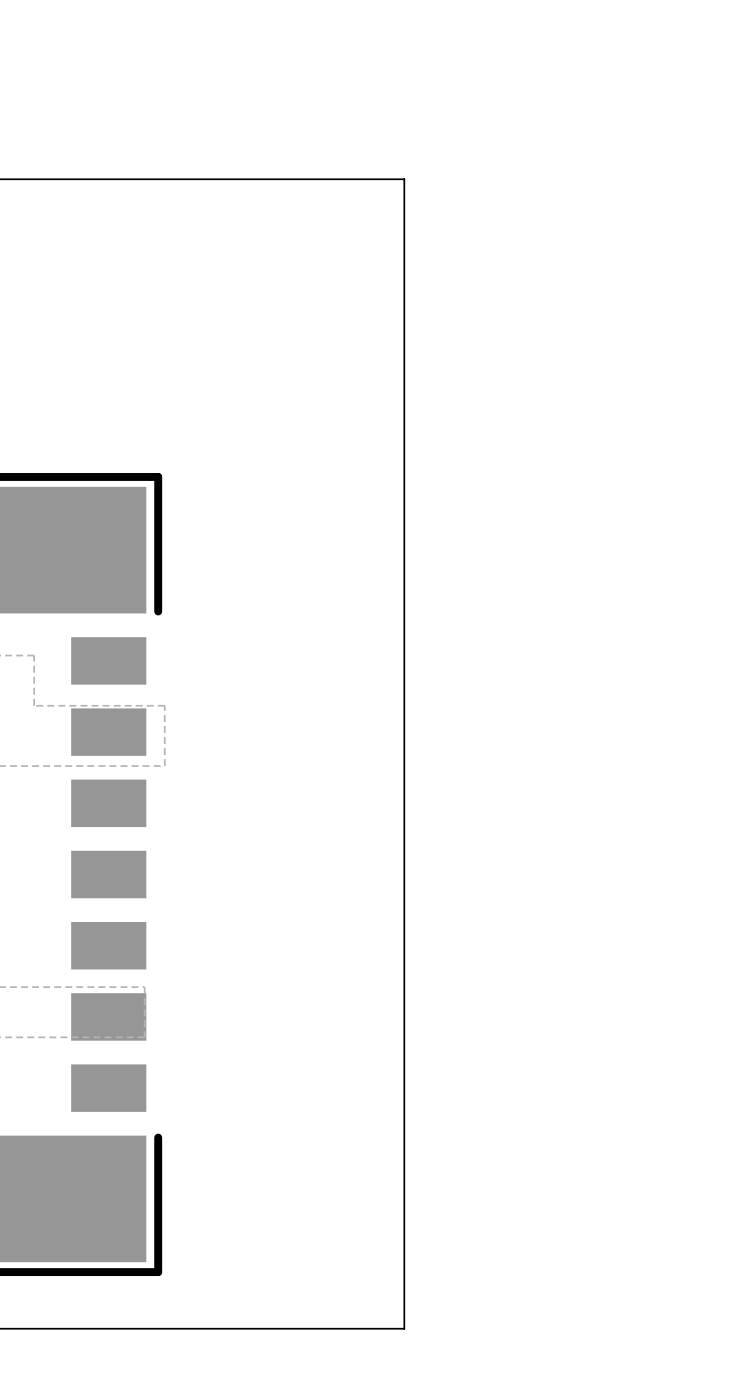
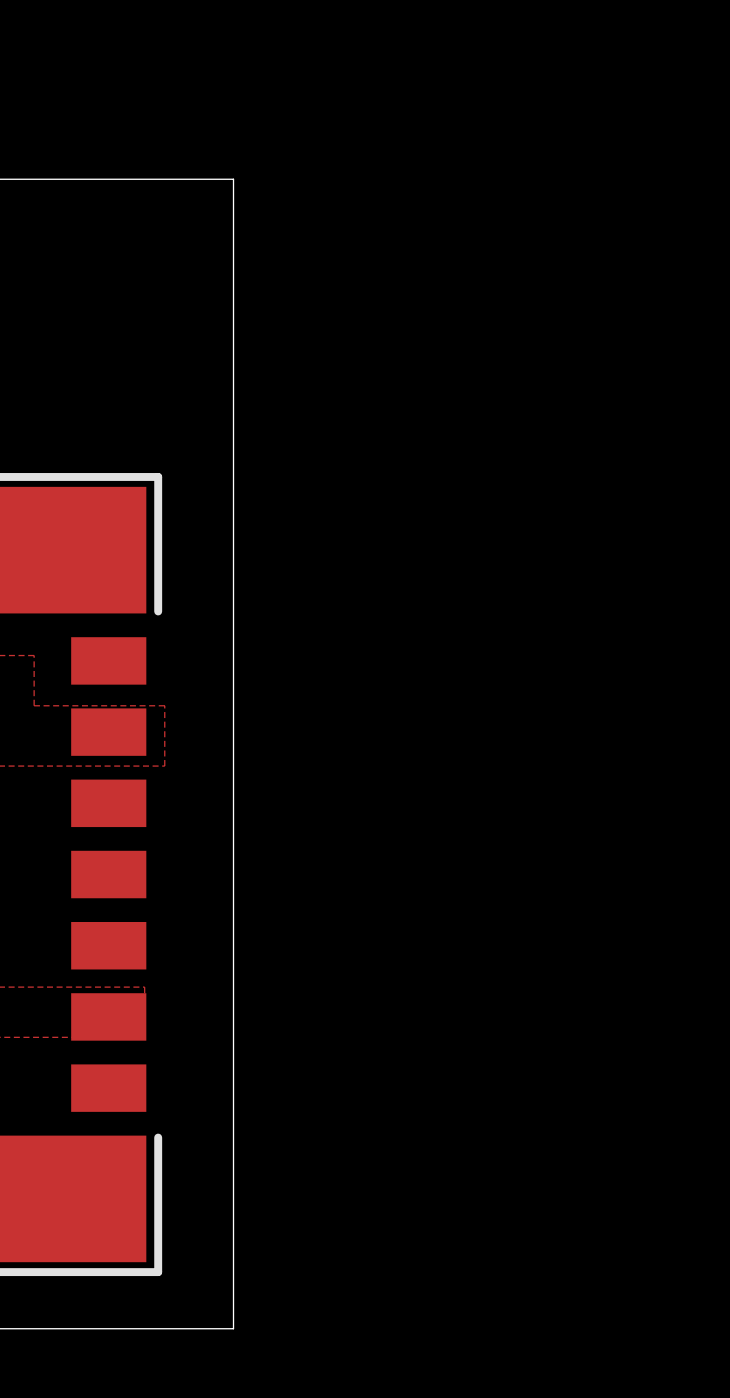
board edge: (233, 179) (404, 179) (404, 1328) (233, 1328) -> (233, 179) (233, 1328)

